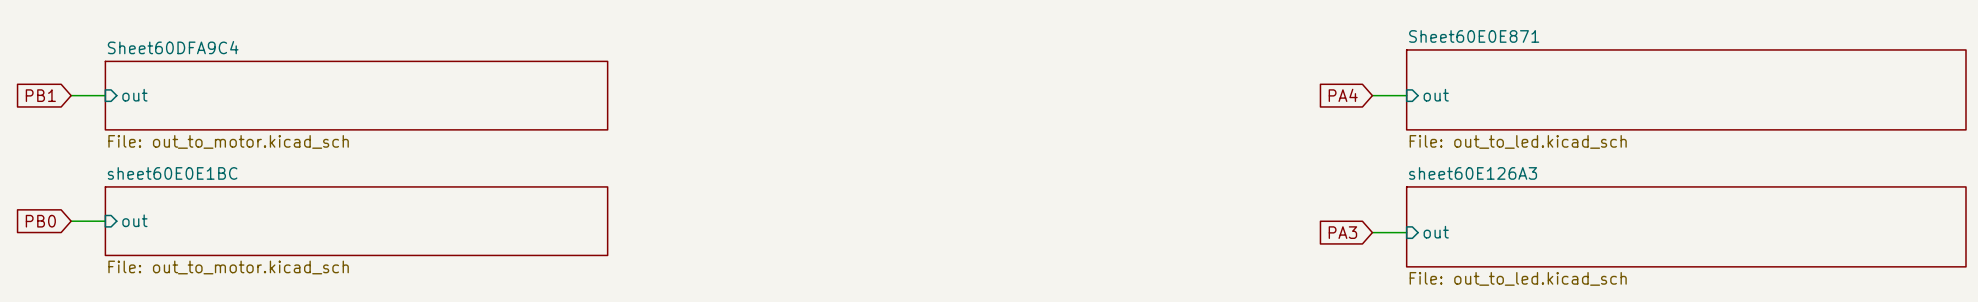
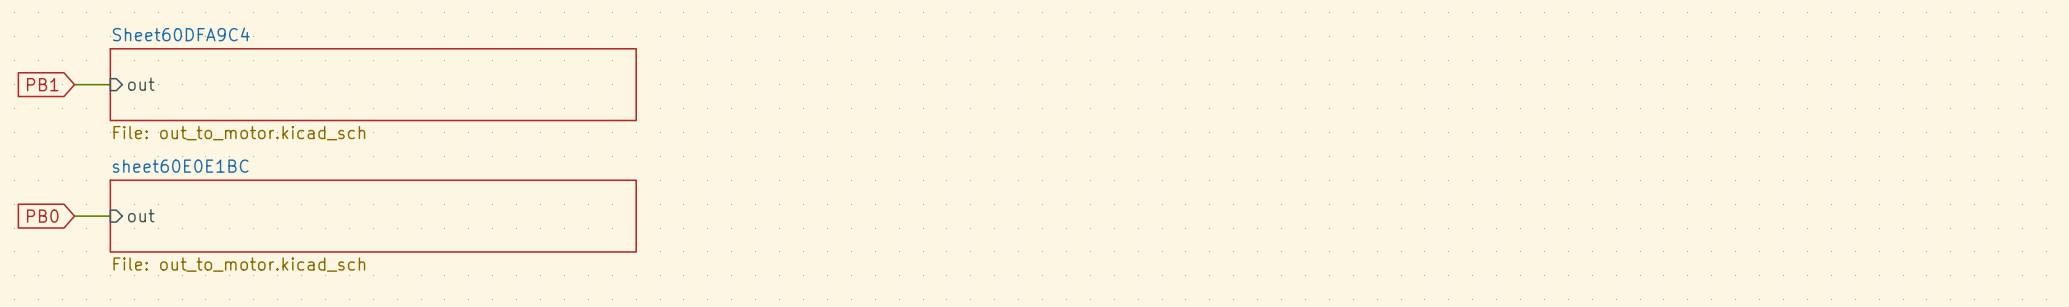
sheet Sheet60E0E871: File: out_to_led.kicad_sch (1686, 89) -> none
global label: PA4 (1343, 95) -> none
wire: (1372, 95) (1406, 95) -> none
sheet pin: out (1436, 95) -> none
sheet sheet60E126A3: File: out_to_led.kicad_sch (1686, 226) -> none
global label: PA3 (1342, 232) -> none
wire: (1372, 232) (1406, 232) -> none
sheet pin: out (1436, 232) -> none

